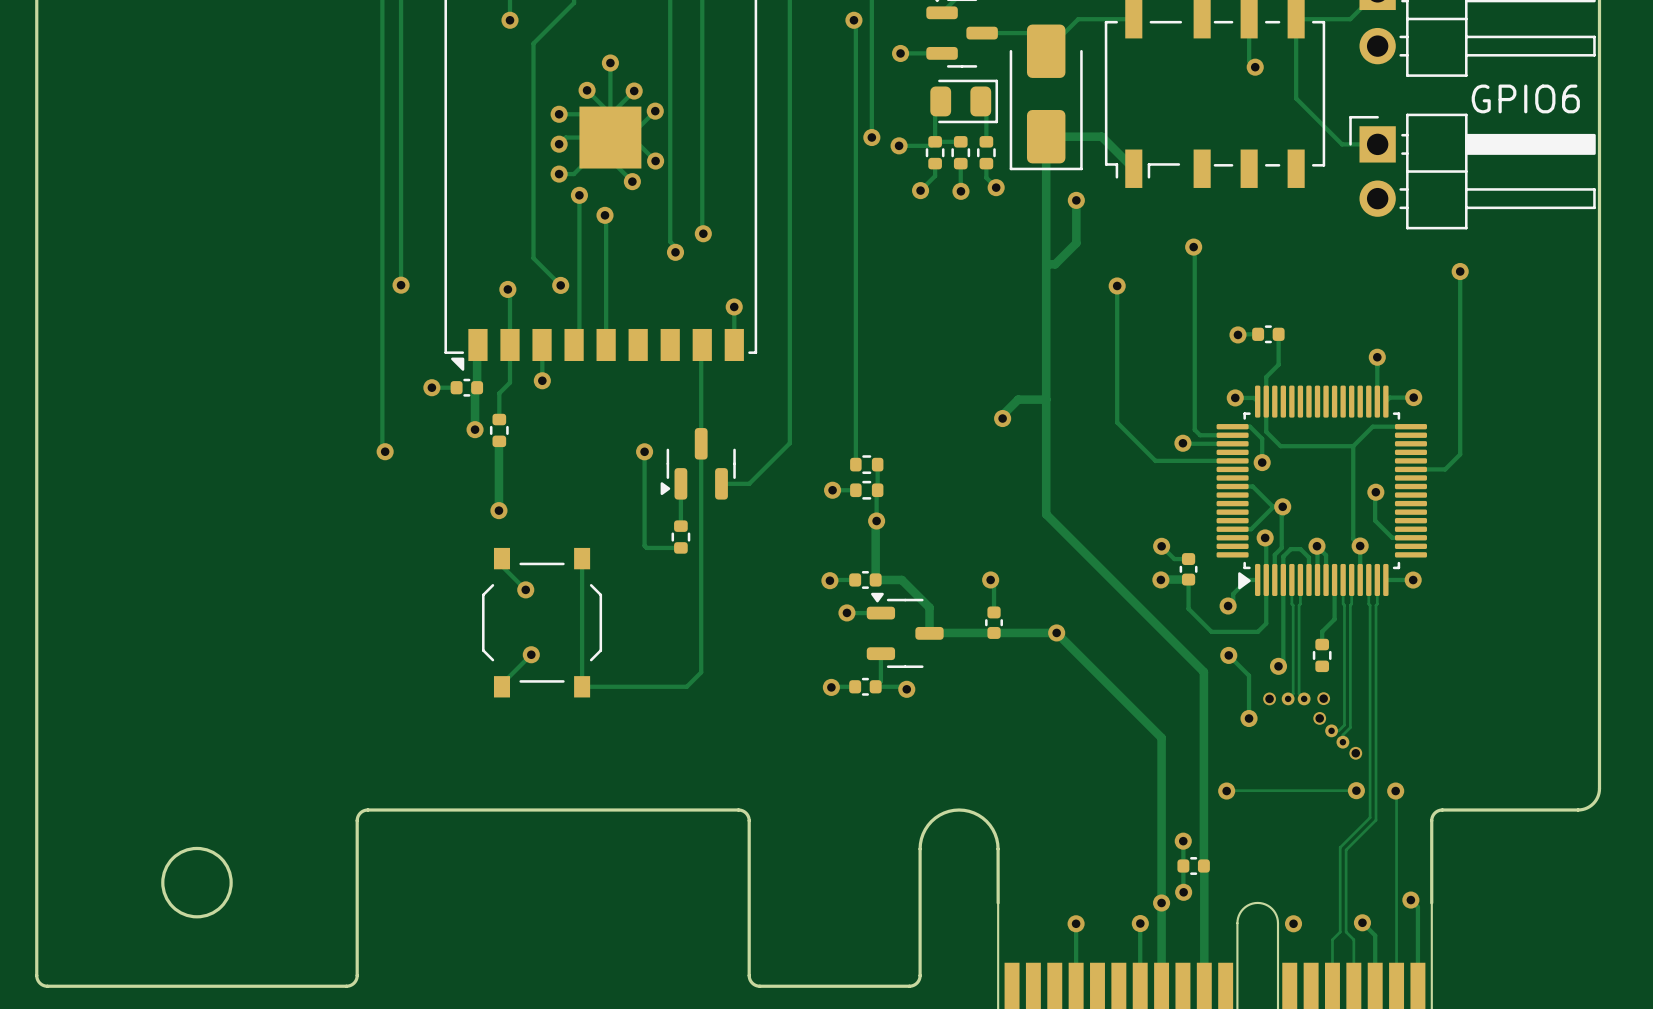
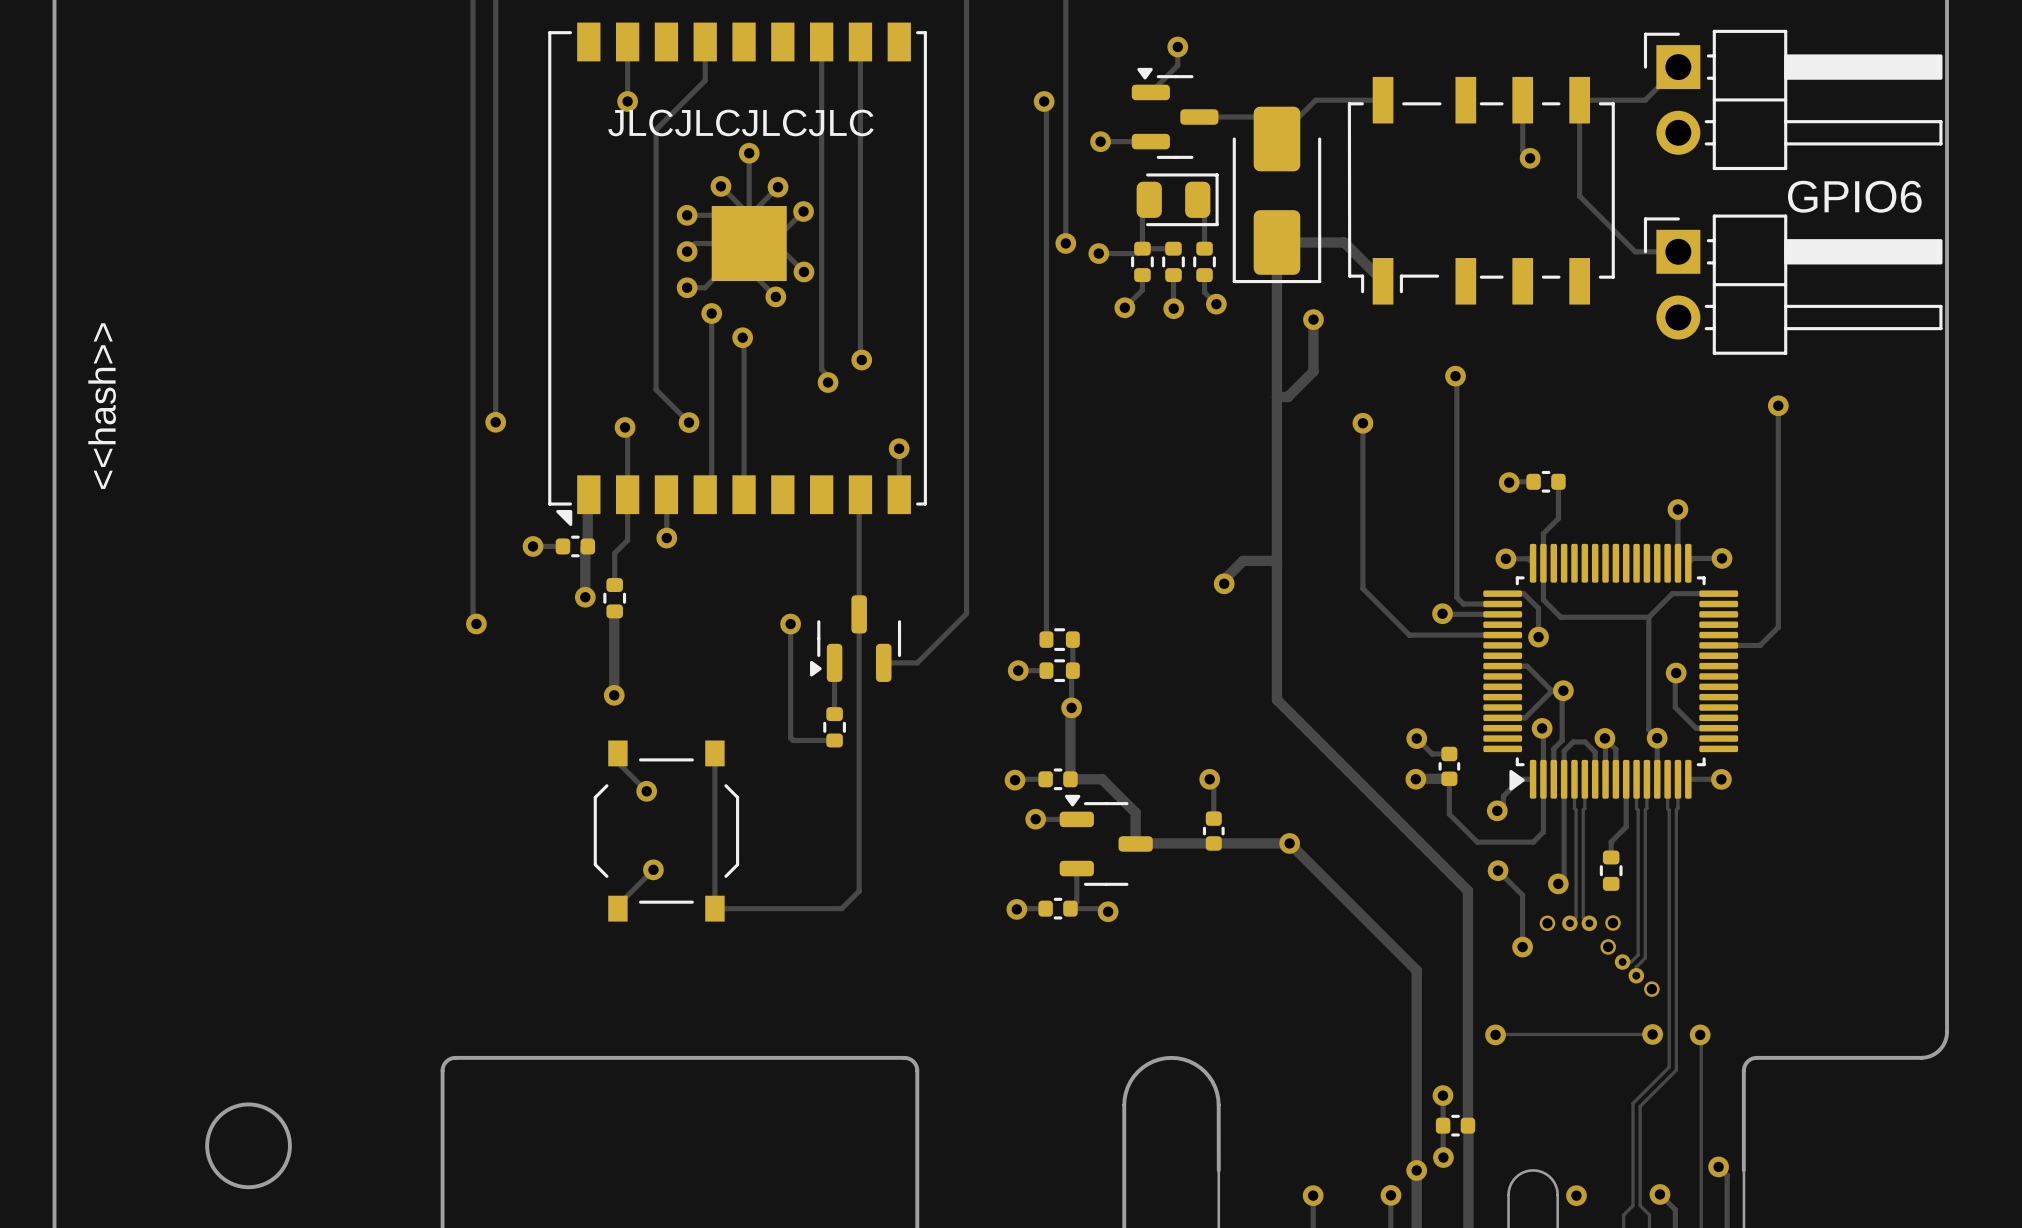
text: none -> JLCJLCJLCJLC (740, 122)
text: none -> <<hash>> (102, 406)

